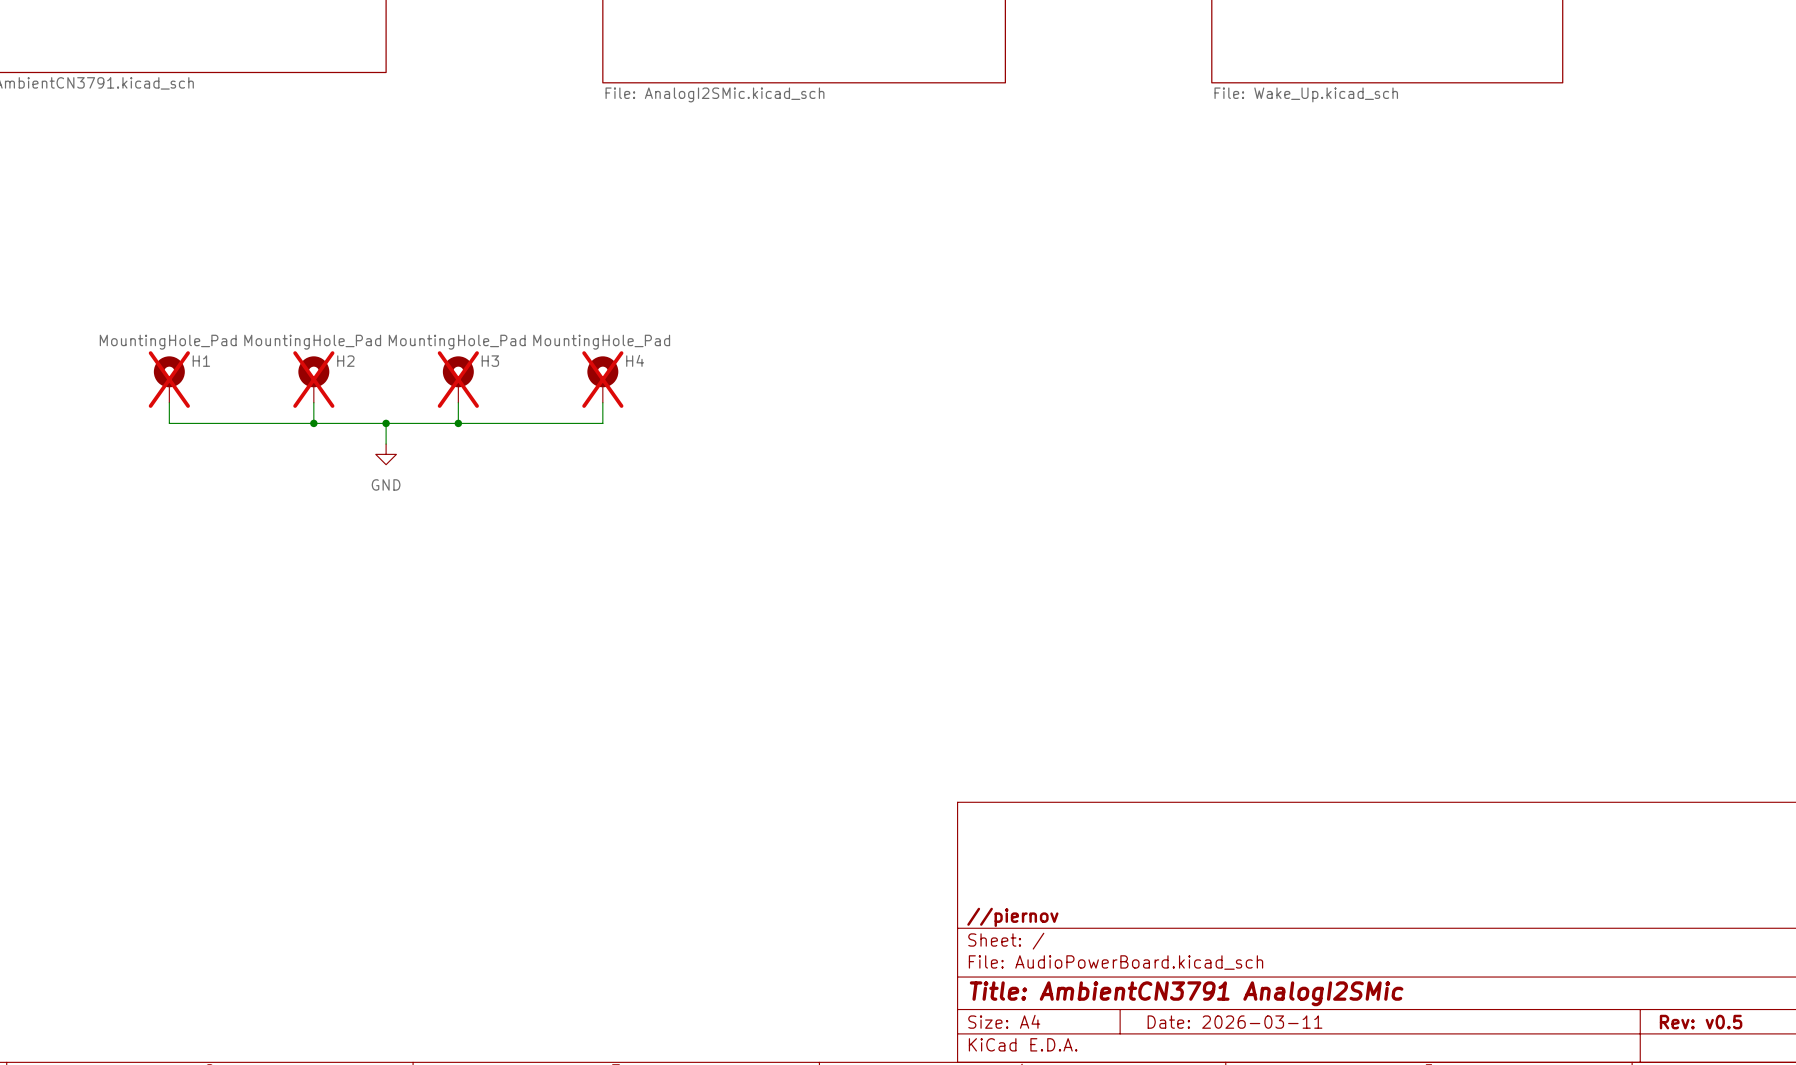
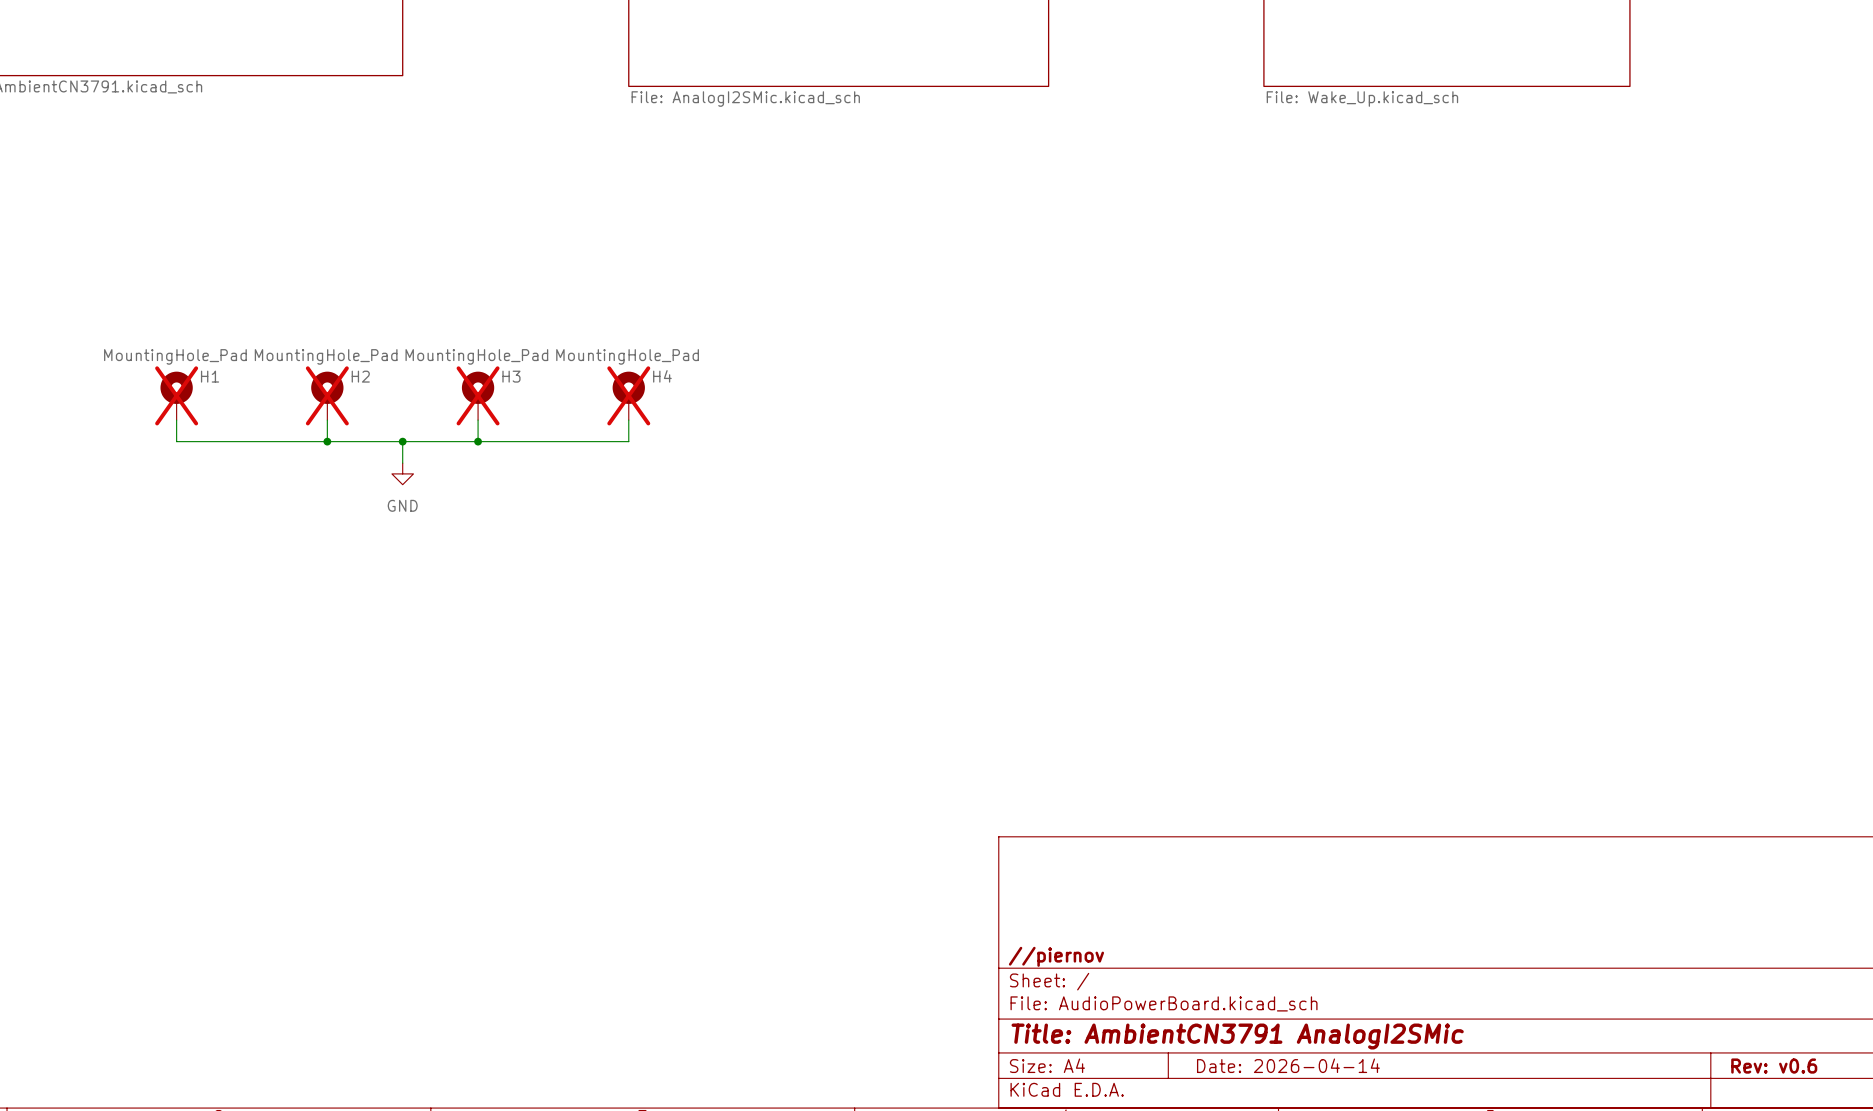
title block: Date: 2026-03-11 (1235, 1022) -> Date: 2026-04-14 (1288, 1065)
title block: Rev: v0.5 (1701, 1022) -> Rev: v0.6 (1774, 1066)

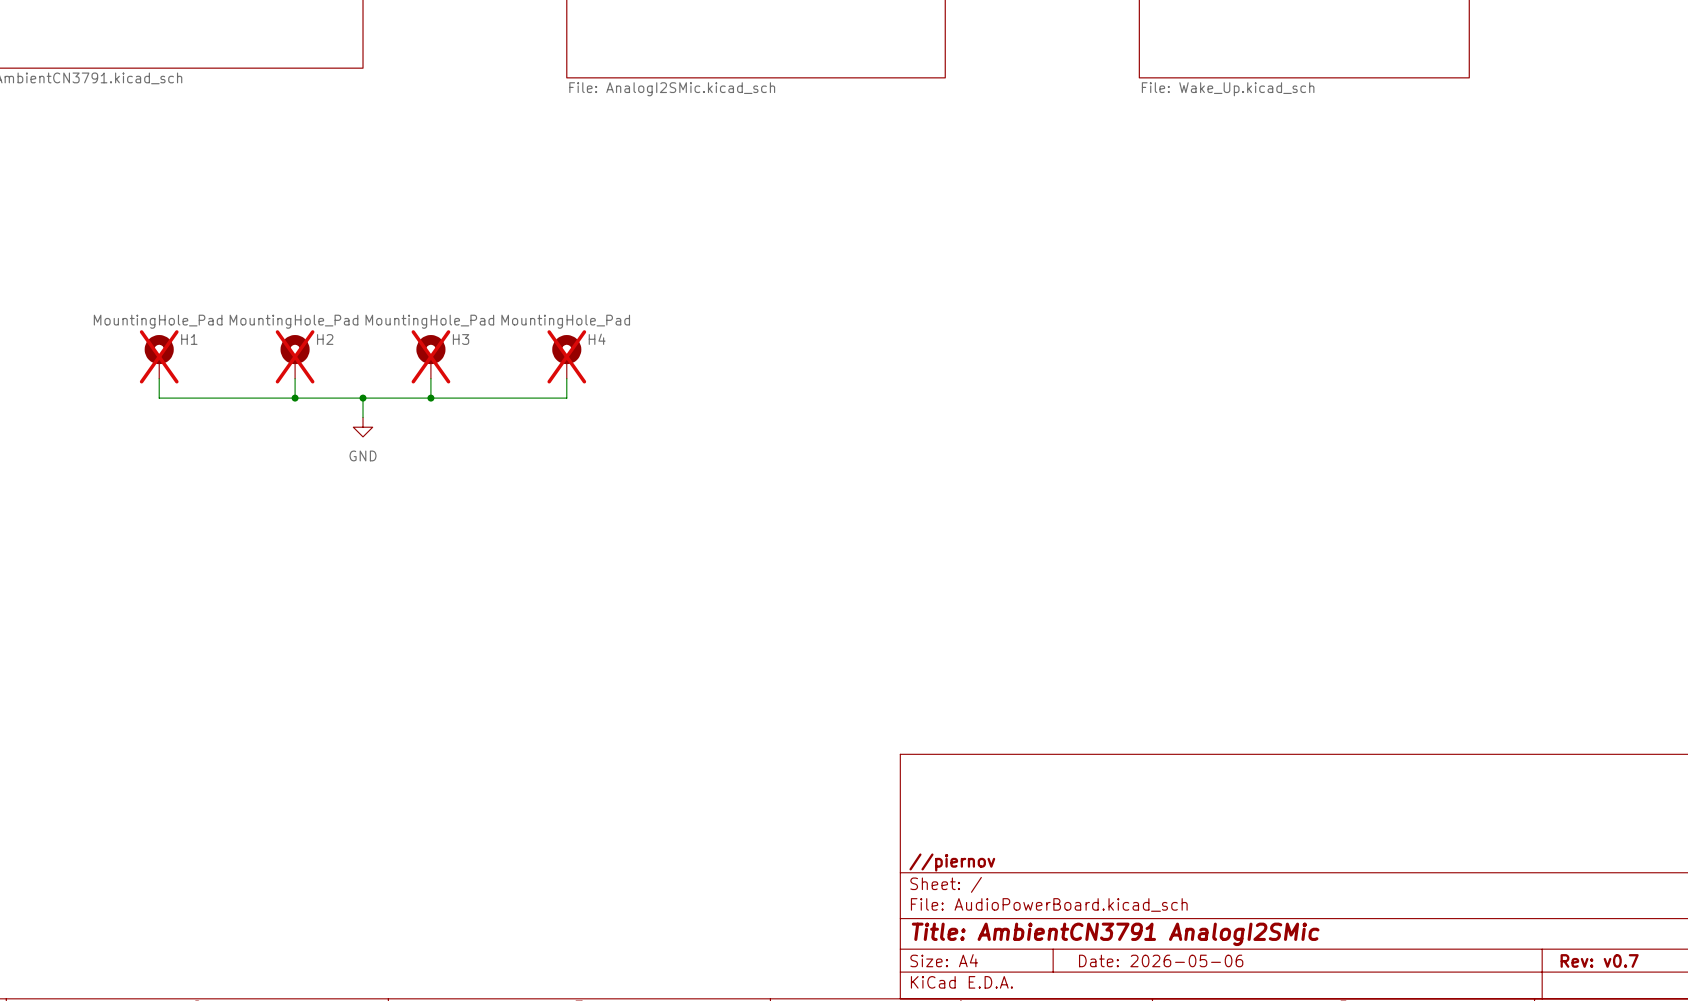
title block: Date: 2026-04-14 (1288, 1065) -> Date: 2026-05-06 (1161, 960)
title block: Rev: v0.6 (1774, 1066) -> Rev: v0.7 (1599, 960)

